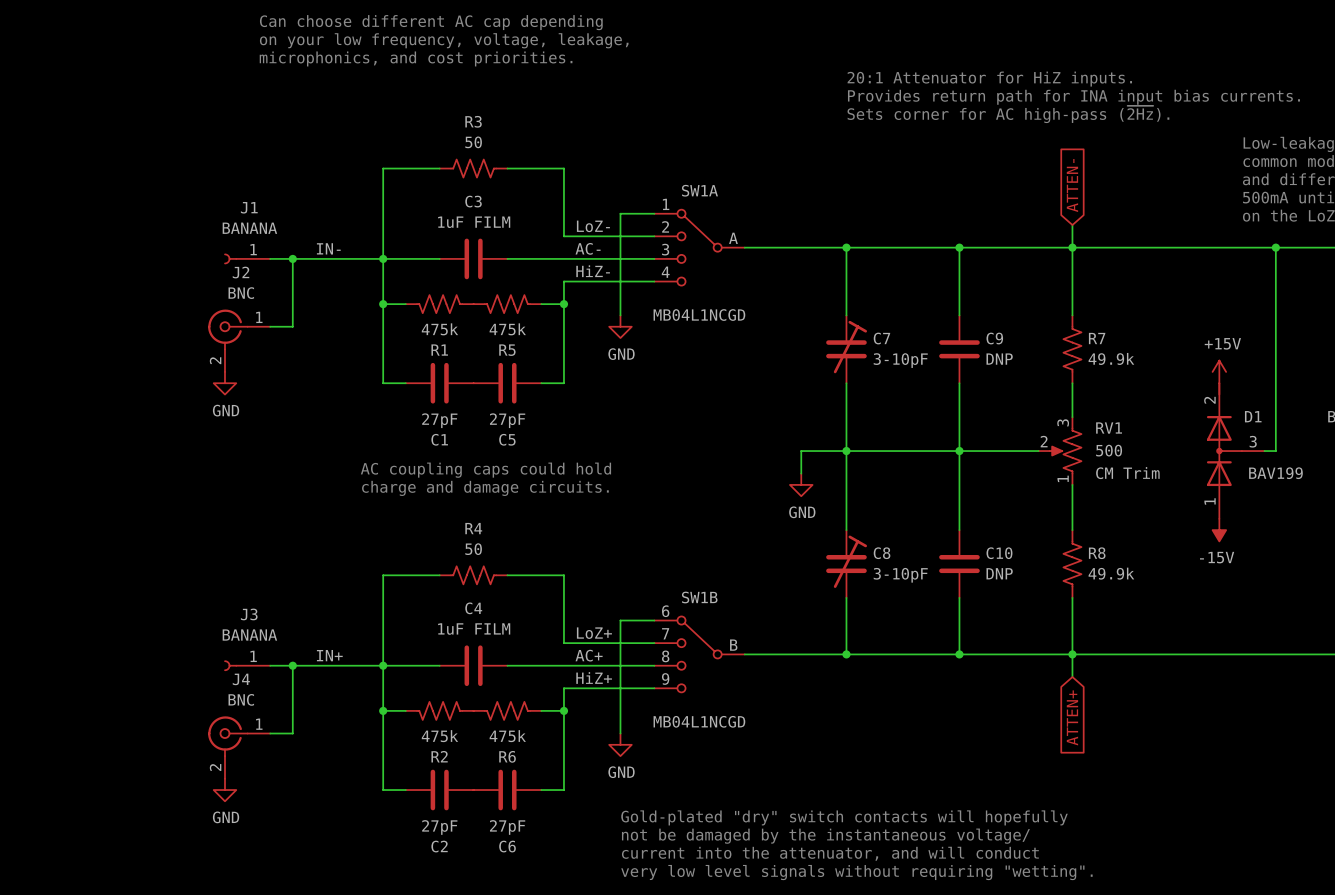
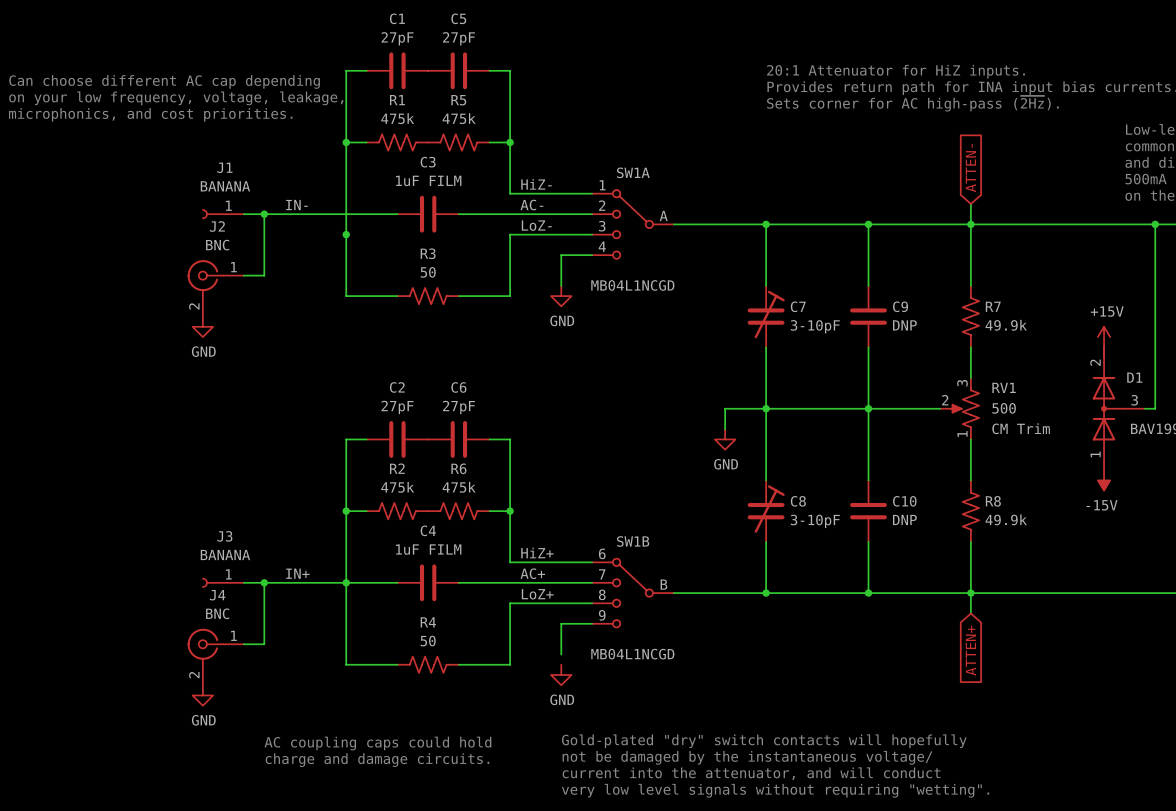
text: Can choose different AC cap depending (431, 22) -> none
text: on your low frequency, voltage, leakage, (444, 40) -> none
text: microphonics, and cost priorities. (416, 58) -> none
text: none -> Can choose different AC cap depending (164, 81)
text: none -> on your low frequency, voltage, leakage, (176, 98)
text: none -> microphonics, and cost priorities. (150, 114)
junction: none -> (346, 142)
junction: none -> (510, 142)
wire: (383, 168) (439, 168) -> (346, 152) (346, 70) (366, 70)
R3 position: (473, 168) -> (428, 296)
wire: (507, 168) (563, 168) -> (489, 70) (510, 70) (510, 152)
wire: (563, 213) (563, 236) -> (510, 193) (561, 193)
wire: (620, 213) (620, 281) (563, 281) -> none
label: LoZ- (593, 226) -> AC- (531, 205)
wire: none -> (264, 214) (264, 234)
wire: none -> (458, 214) (510, 214)
label position: IN- (328, 248) -> IN- (296, 205)
label: AC- (588, 248) -> LoZ- (536, 225)
J1 position: (247, 258) -> (223, 214)
wire: (270, 258) (439, 258) -> (243, 214) (397, 214)
junction position: (292, 258) -> (264, 214)
C3 position: (473, 258) -> (428, 214)
wire: (507, 258) (563, 258) -> (510, 255) (510, 234)
label position: HiZ- (593, 271) -> HiZ- (536, 184)
wire: (292, 304) (292, 326) (270, 326) -> (264, 275) (243, 275)
wire: (383, 304) (405, 304) -> (346, 142) (366, 142)
junction: (383, 304) -> none
R1 flip: as is (439, 304) -> left-right (397, 142)
R1 position: (439, 304) -> (397, 142)
R5 flip: as is (507, 304) -> left-right (458, 142)
R5 position: (507, 304) -> (458, 142)
wire: (541, 304) (563, 304) -> (489, 142) (510, 142)
junction: (563, 304) -> none
wire: (383, 326) (383, 383) (405, 383) -> (346, 296) (397, 296)
wire: (563, 326) (563, 383) (541, 383) -> (510, 296) (458, 296)
R1 value position: 475k (439, 329) -> 475k (397, 118)
R5 value position: 475k (507, 329) -> 475k (459, 118)
J2 position: (239, 340) -> (215, 288)
R1 name position: R1 (439, 350) -> R1 (397, 100)
R5 name position: R5 (507, 350) -> R5 (458, 100)
power symbol position: GND (224, 383) -> GND (202, 326)
C1 position: (439, 383) -> (397, 70)
C5 position: (507, 383) -> (458, 70)
C1 value position: 27pF (439, 420) -> 27pF (397, 38)
C5 value position: 27pF (507, 420) -> 27pF (458, 38)
C1 name position: C1 (439, 439) -> C1 (397, 18)
C5 name position: C5 (507, 439) -> C5 (458, 18)
text: AC coupling caps could hold (485, 470) -> none
text: charge and damage circuits. (485, 488) -> none
junction: none -> (346, 511)
junction: none -> (510, 511)
wire: (383, 575) (439, 575) -> (346, 521) (346, 439) (366, 439)
R4 position: (473, 575) -> (428, 664)
wire: (507, 575) (563, 575) -> (489, 439) (510, 439) (510, 521)
wire: (563, 620) (563, 643) -> (510, 562) (561, 562)
wire: (620, 620) (620, 688) (563, 688) -> none
label: LoZ+ (594, 633) -> AC+ (532, 573)
wire: none -> (264, 582) (264, 603)
wire: none -> (458, 582) (510, 582)
label position: IN+ (329, 655) -> IN+ (297, 573)
label: AC+ (589, 655) -> LoZ+ (537, 594)
J3 position: (247, 665) -> (223, 582)
wire: (270, 665) (439, 665) -> (243, 582) (397, 582)
junction position: (292, 665) -> (264, 582)
junction position: (383, 665) -> (346, 582)
C4 position: (473, 665) -> (428, 582)
wire: (507, 665) (563, 665) -> (510, 623) (510, 603)
label position: HiZ+ (594, 677) -> HiZ+ (537, 552)
wire: (292, 710) (292, 733) (270, 733) -> (264, 644) (243, 644)
wire: (383, 710) (405, 710) -> (346, 511) (366, 511)
junction: (383, 710) -> none
R2 flip: as is (439, 710) -> left-right (397, 511)
R2 position: (439, 710) -> (397, 511)
R6 flip: as is (507, 710) -> left-right (458, 511)
R6 position: (507, 710) -> (458, 511)
wire: (541, 710) (563, 710) -> (489, 511) (510, 511)
junction: (563, 710) -> none
wire: (620, 722) (620, 733) -> none
wire: (383, 733) (383, 790) (405, 790) -> (346, 664) (397, 664)
wire: (563, 733) (563, 790) (541, 790) -> (510, 664) (458, 664)
R2 value position: 475k (439, 736) -> 475k (397, 487)
R6 value position: 475k (507, 736) -> 475k (459, 487)
J4 position: (239, 747) -> (215, 656)
R2 name position: R2 (439, 756) -> R2 (397, 468)
R6 name position: R6 (507, 756) -> R6 (458, 468)
power symbol position: GND (224, 790) -> GND (202, 695)
C2 position: (439, 790) -> (397, 439)
C6 position: (507, 790) -> (458, 439)
text: none -> AC coupling caps could hold (377, 743)
C2 value position: 27pF (439, 827) -> 27pF (397, 407)
C6 value position: 27pF (507, 827) -> 27pF (458, 407)
text: none -> charge and damage circuits. (377, 760)
C2 name position: C2 (439, 846) -> C2 (397, 387)
C6 name position: C6 (507, 846) -> C6 (458, 387)

